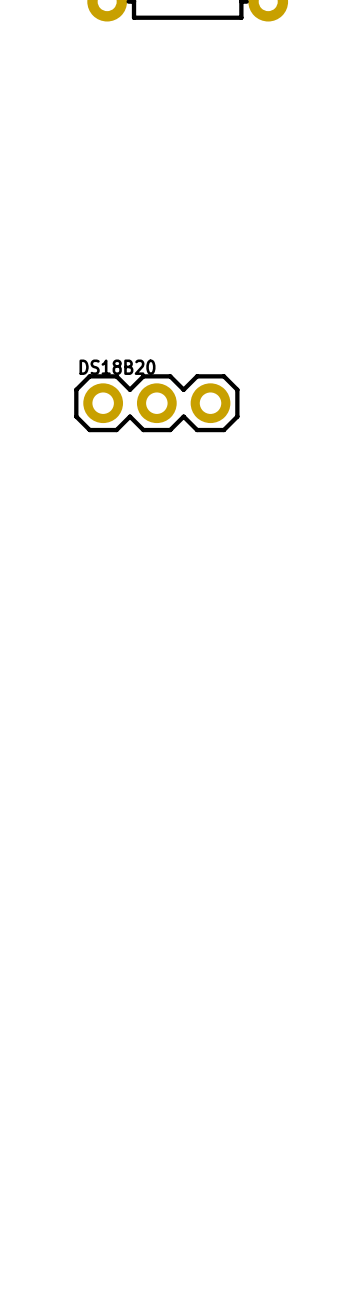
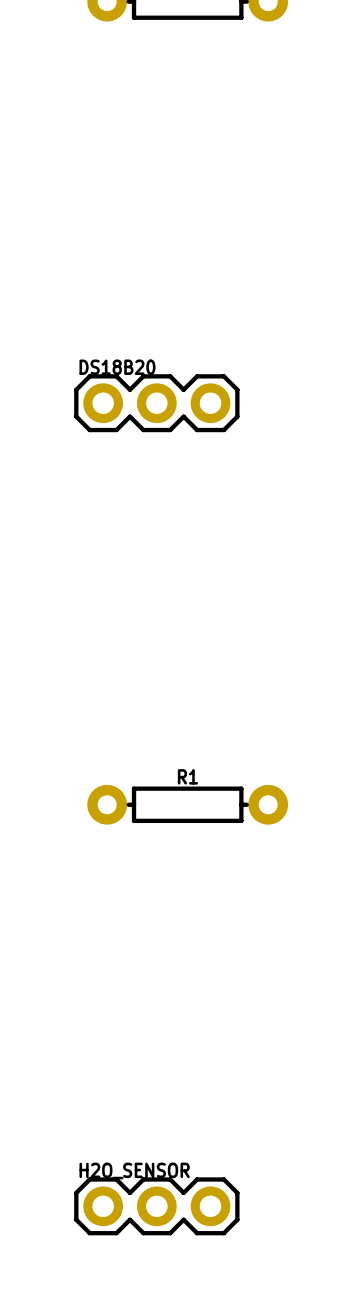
R1: none -> (187, 804)
H2O_SENSOR: none -> (156, 1206)

